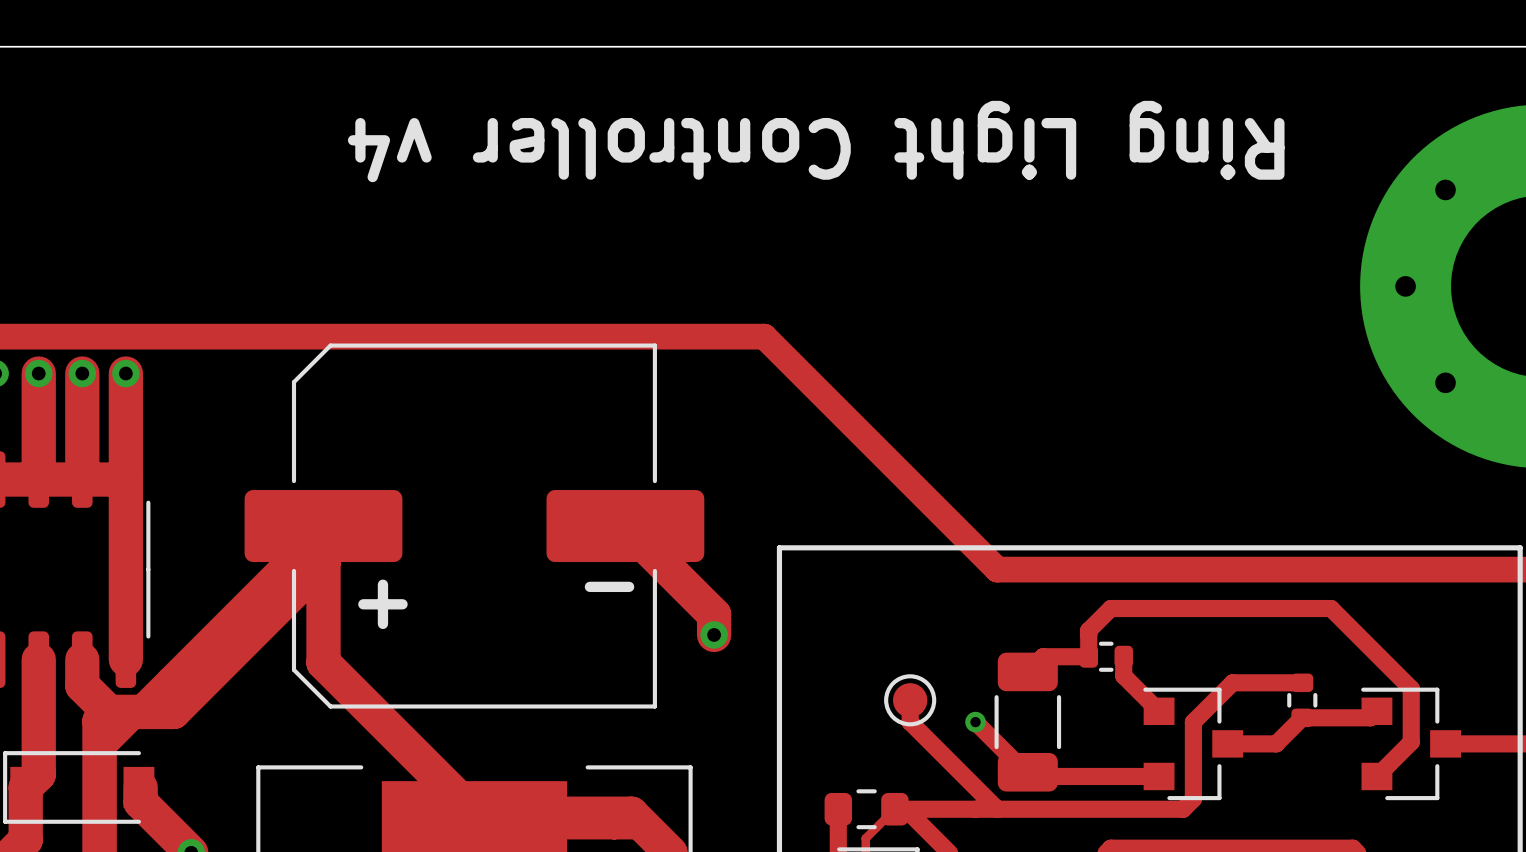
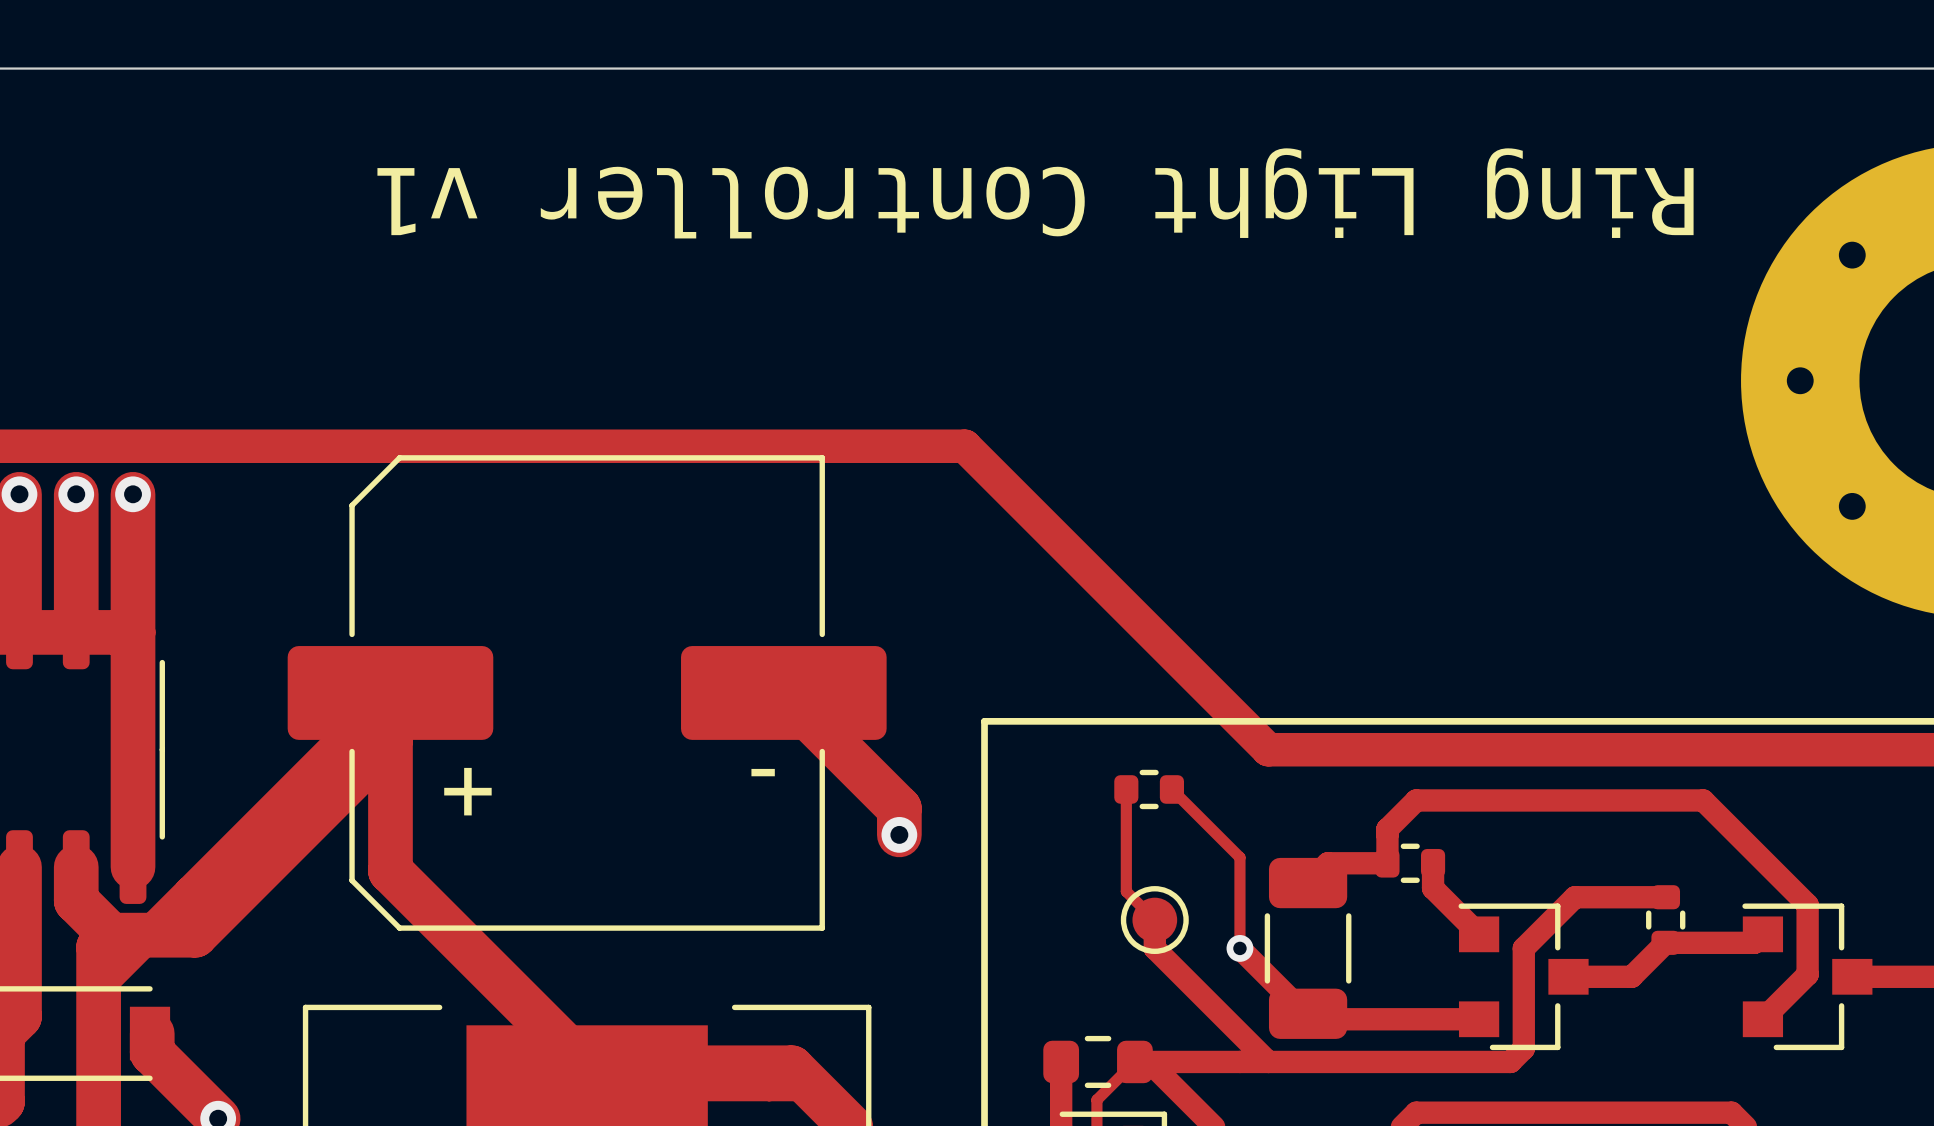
text: Ring Light Controller v4 (816, 141) -> Ring Light Controller v1 (1035, 193)
track: none -> (1126, 789) (1126, 891) (1154, 920)
part: none -> (1149, 789)
track: none -> (1171, 789) (1239, 857) (1239, 948)

